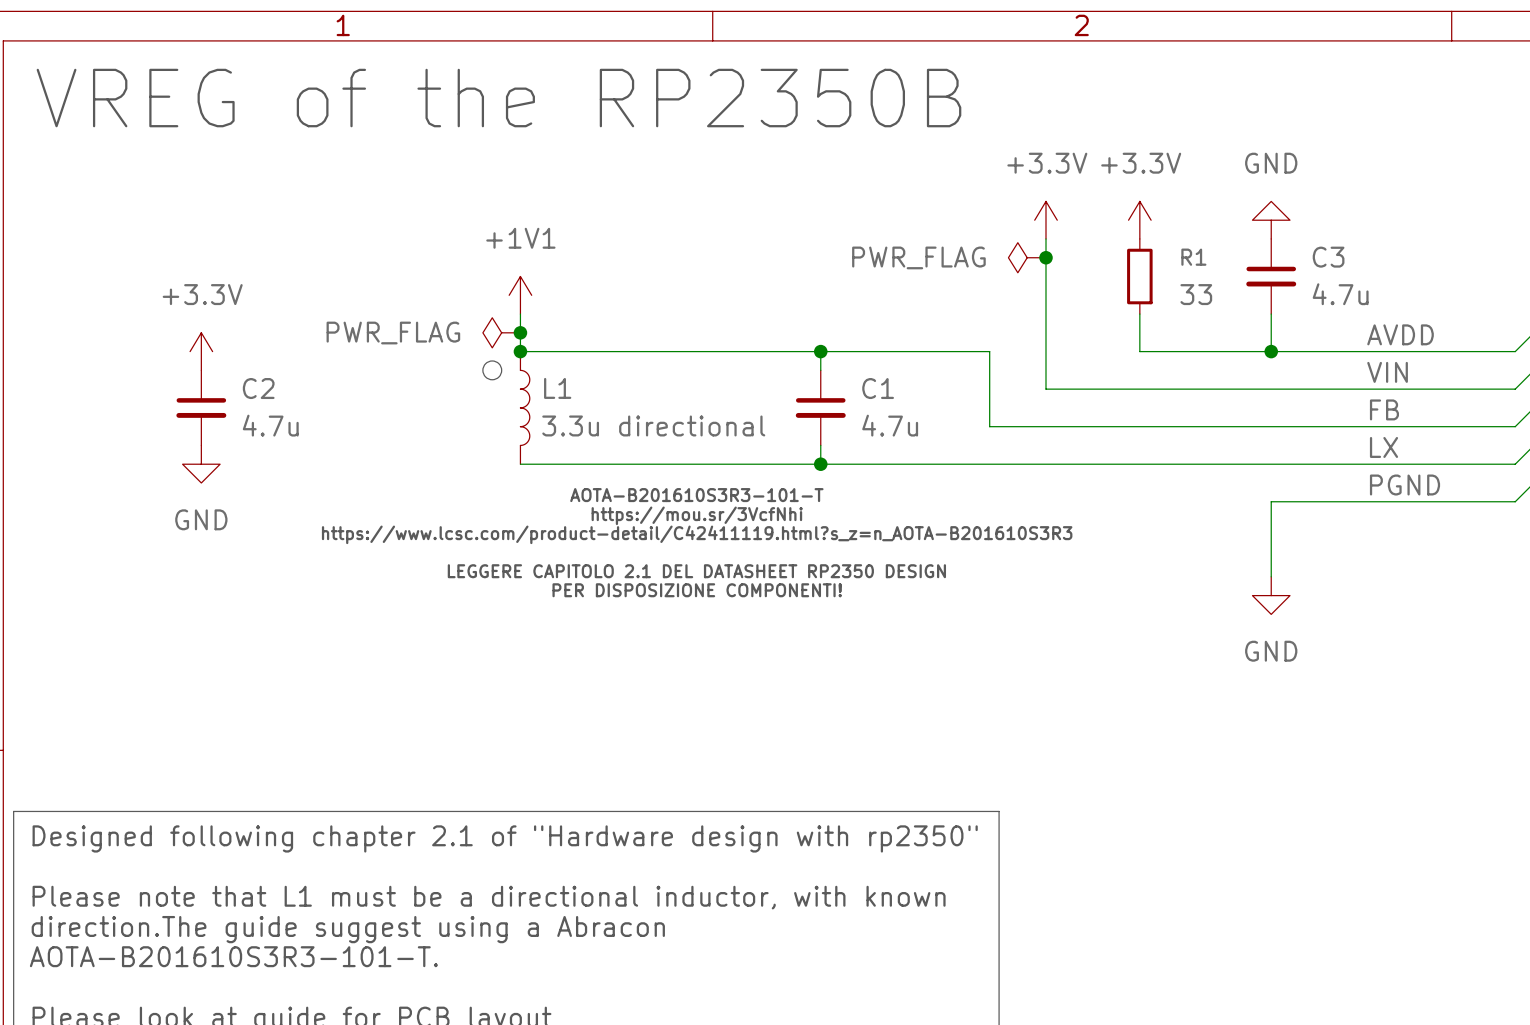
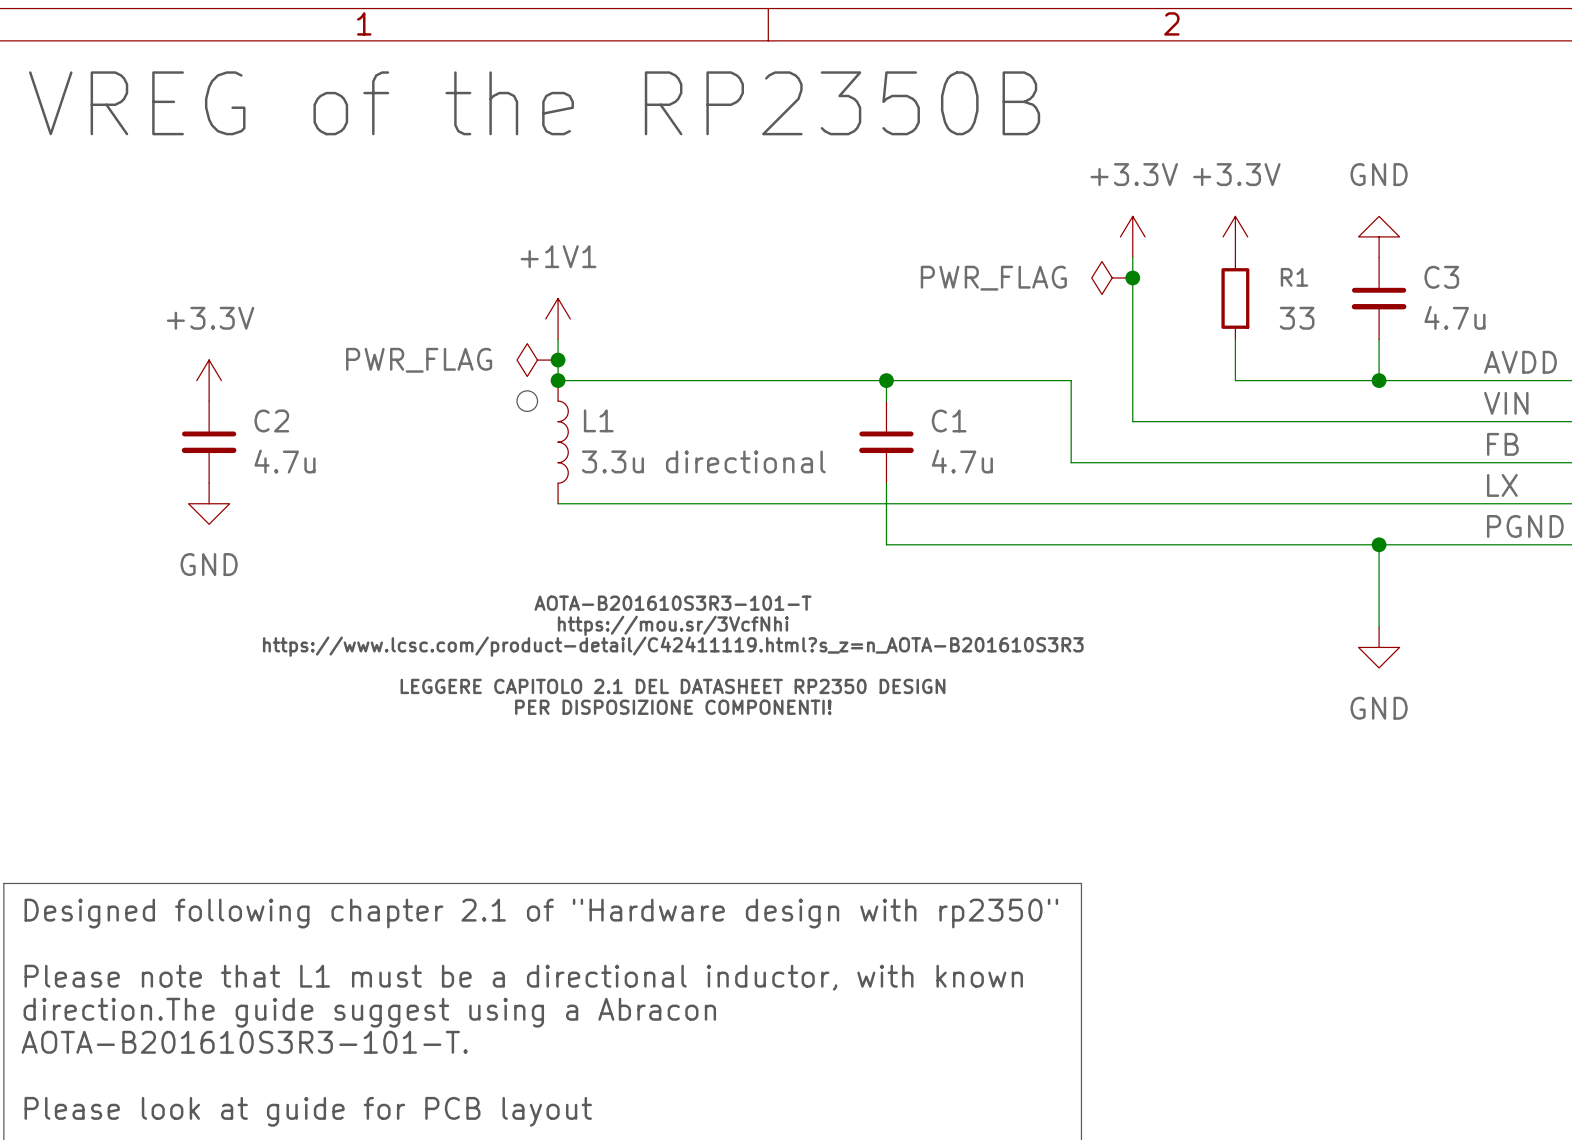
wire: none -> (886, 503) (886, 544) (1379, 544)
junction: (820, 464) -> none
text position: AOTA-B201610S3R3-101-T (696, 495) -> AOTA-B201610S3R3-101-T (672, 603)
junction: none -> (1379, 544)
text position: https://mou.sr/3VcfNhi (697, 515) -> https://mou.sr/3VcfNhi (673, 625)
text position: https://www.lcsc.com/product-detail/C42411119.html?s_z=n_AOTA-B201610S3R3 (697, 534) -> https://www.lcsc.com/product-detail/C42411119.html?s_z=n_AOTA-B201610S3R3 (673, 646)
text position: LEGGERE CAPITOLO 2.1 DEL DATASHEET RP2350 DESIGN (696, 571) -> LEGGERE CAPITOLO 2.1 DEL DATASHEET RP2350 DESIGN (672, 686)
text position: PER DISPOSIZIONE COMPONENTI! (697, 590) -> PER DISPOSIZIONE COMPONENTI! (673, 707)

